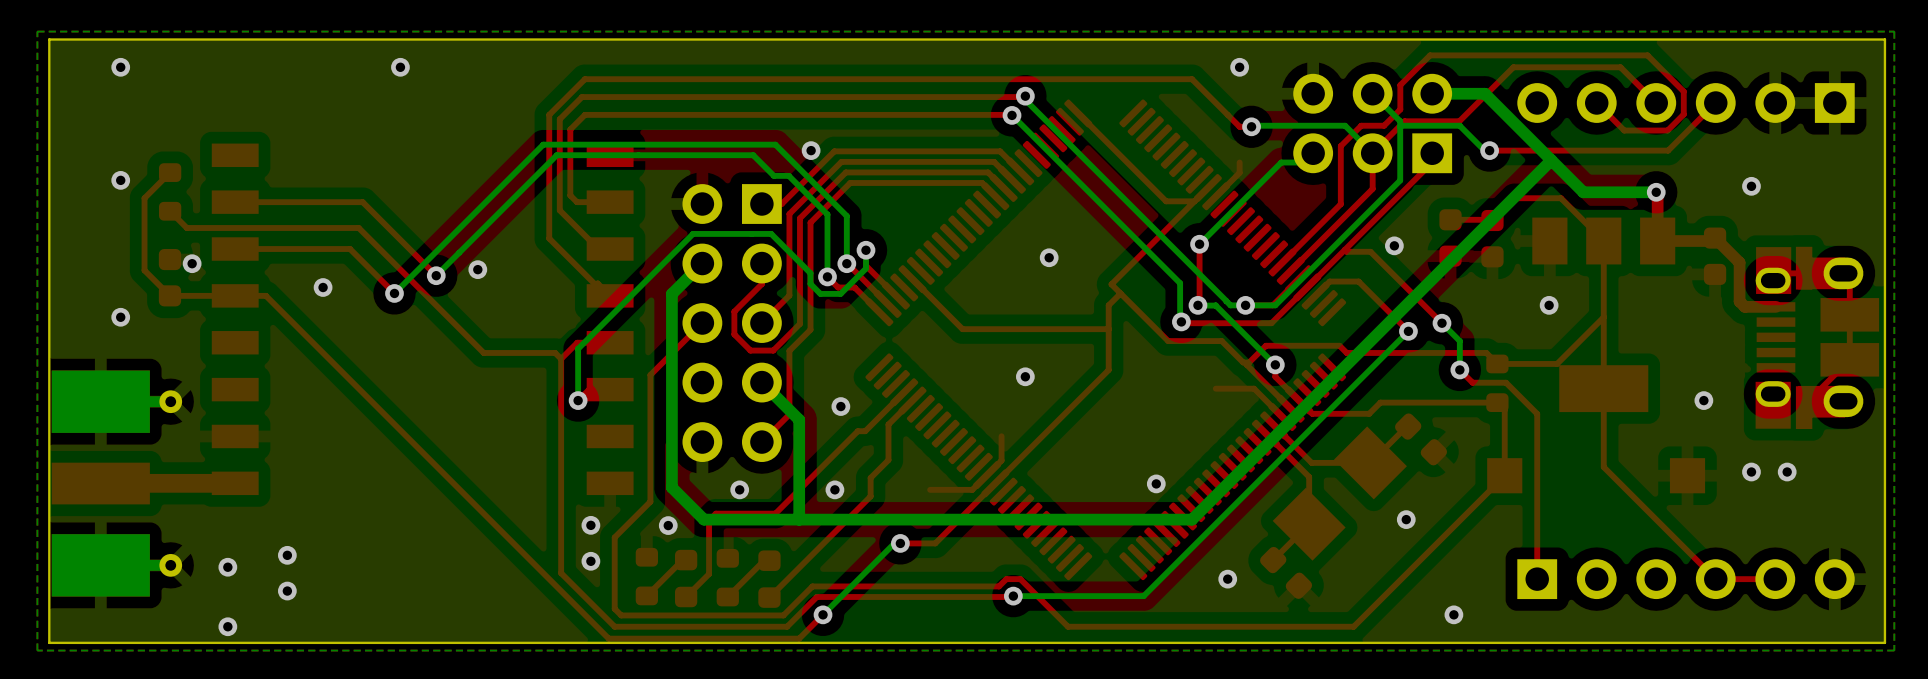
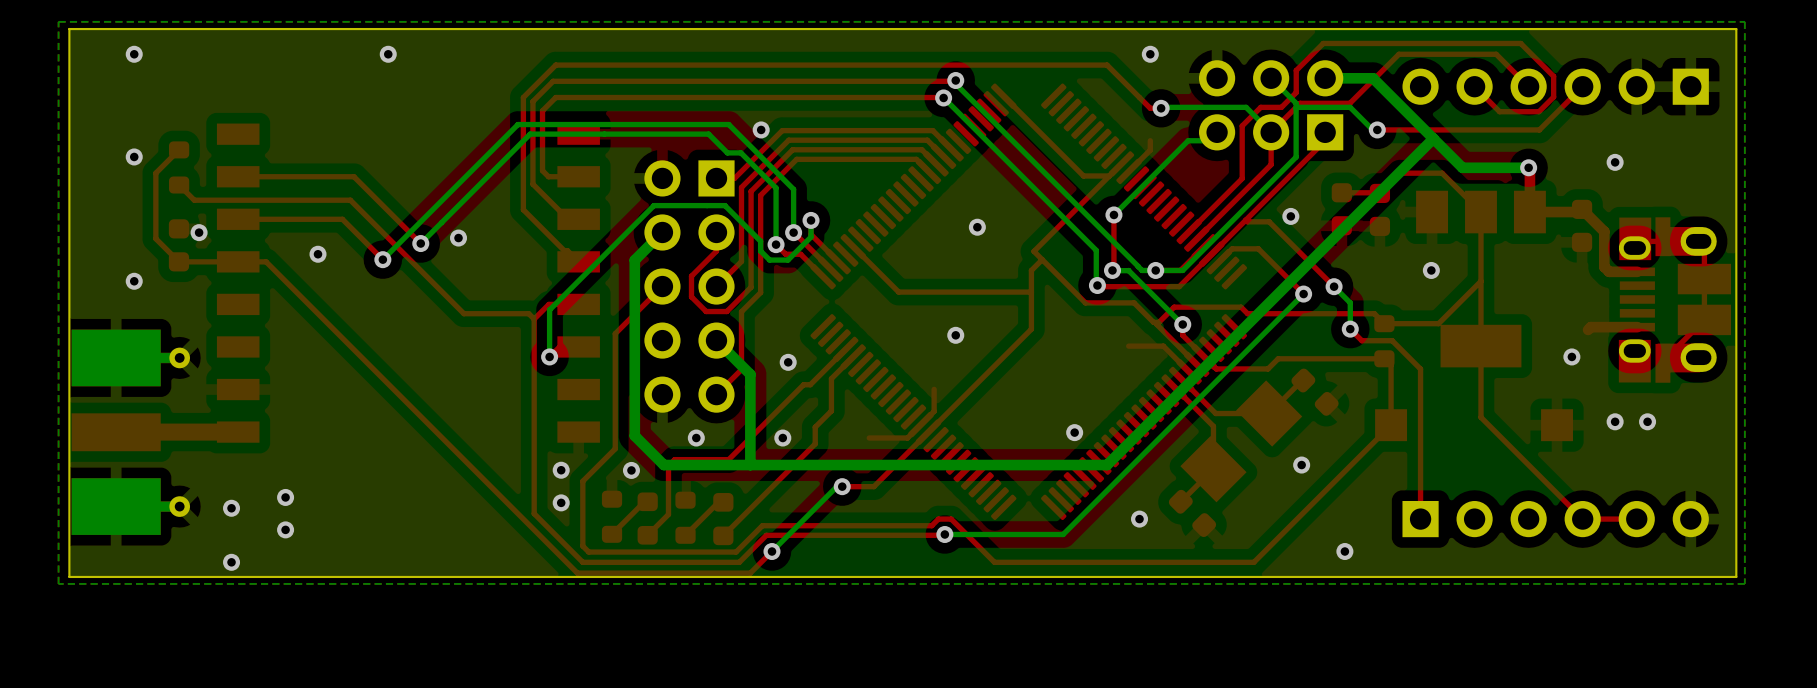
top track: none -> (1637, 327) (1590, 327) (1588, 329)

